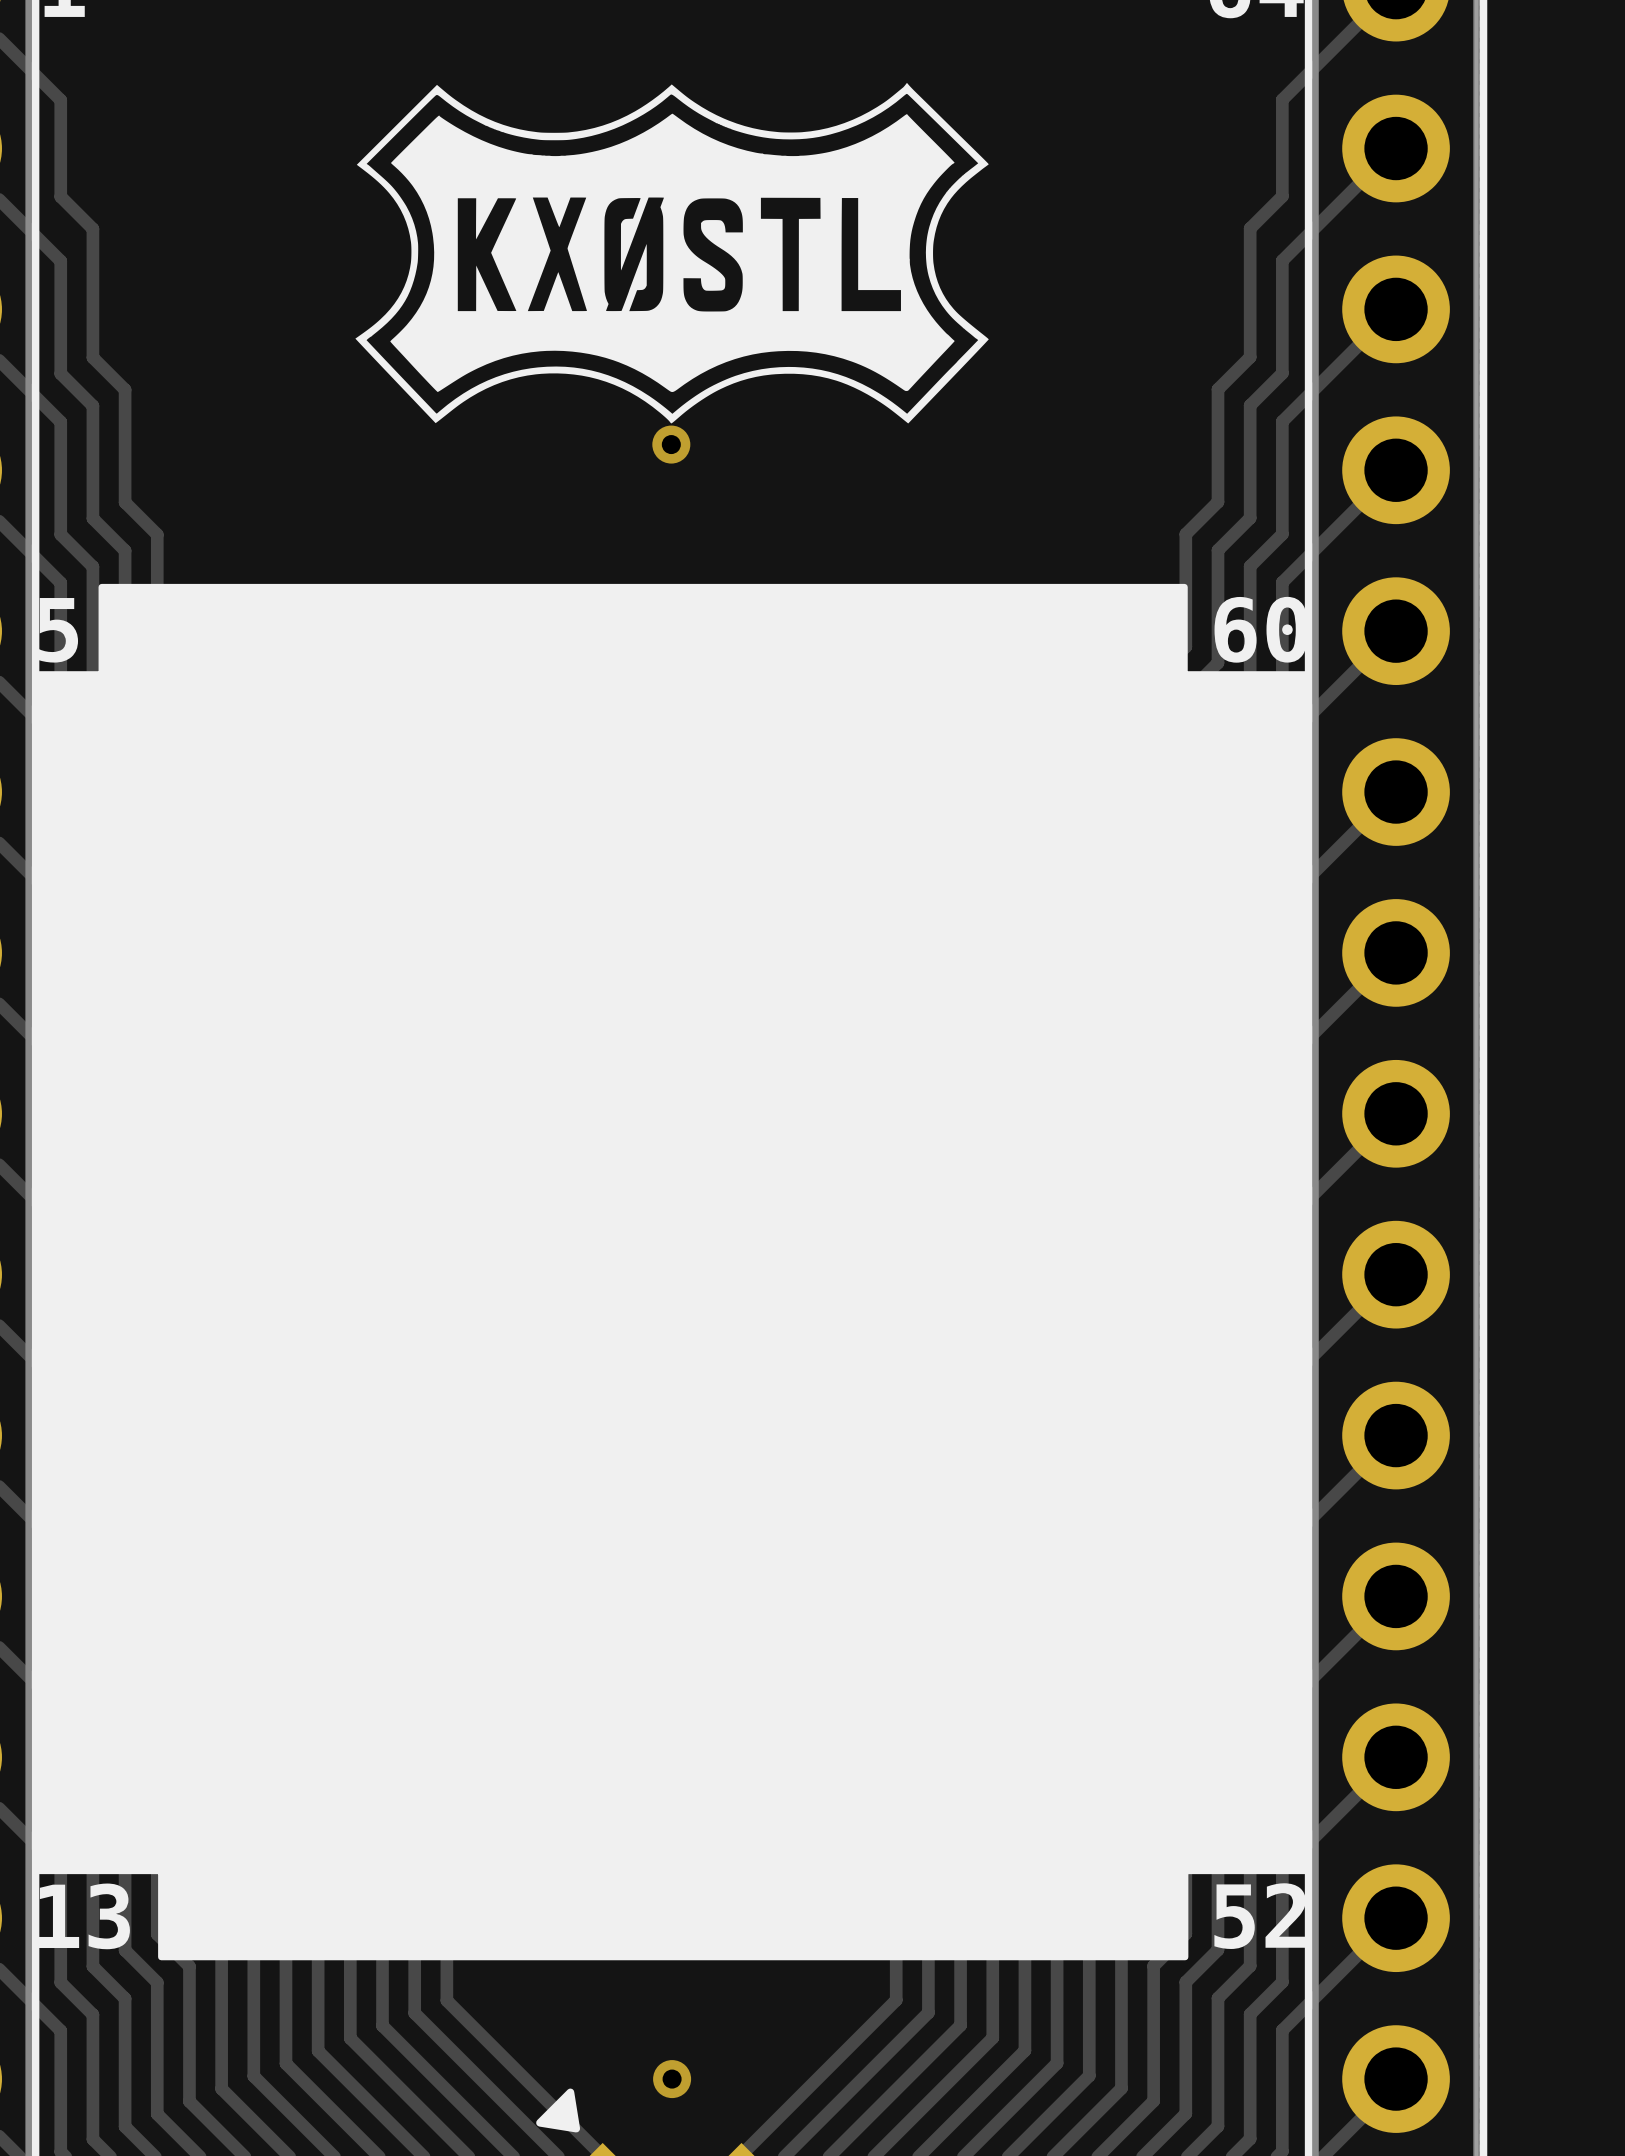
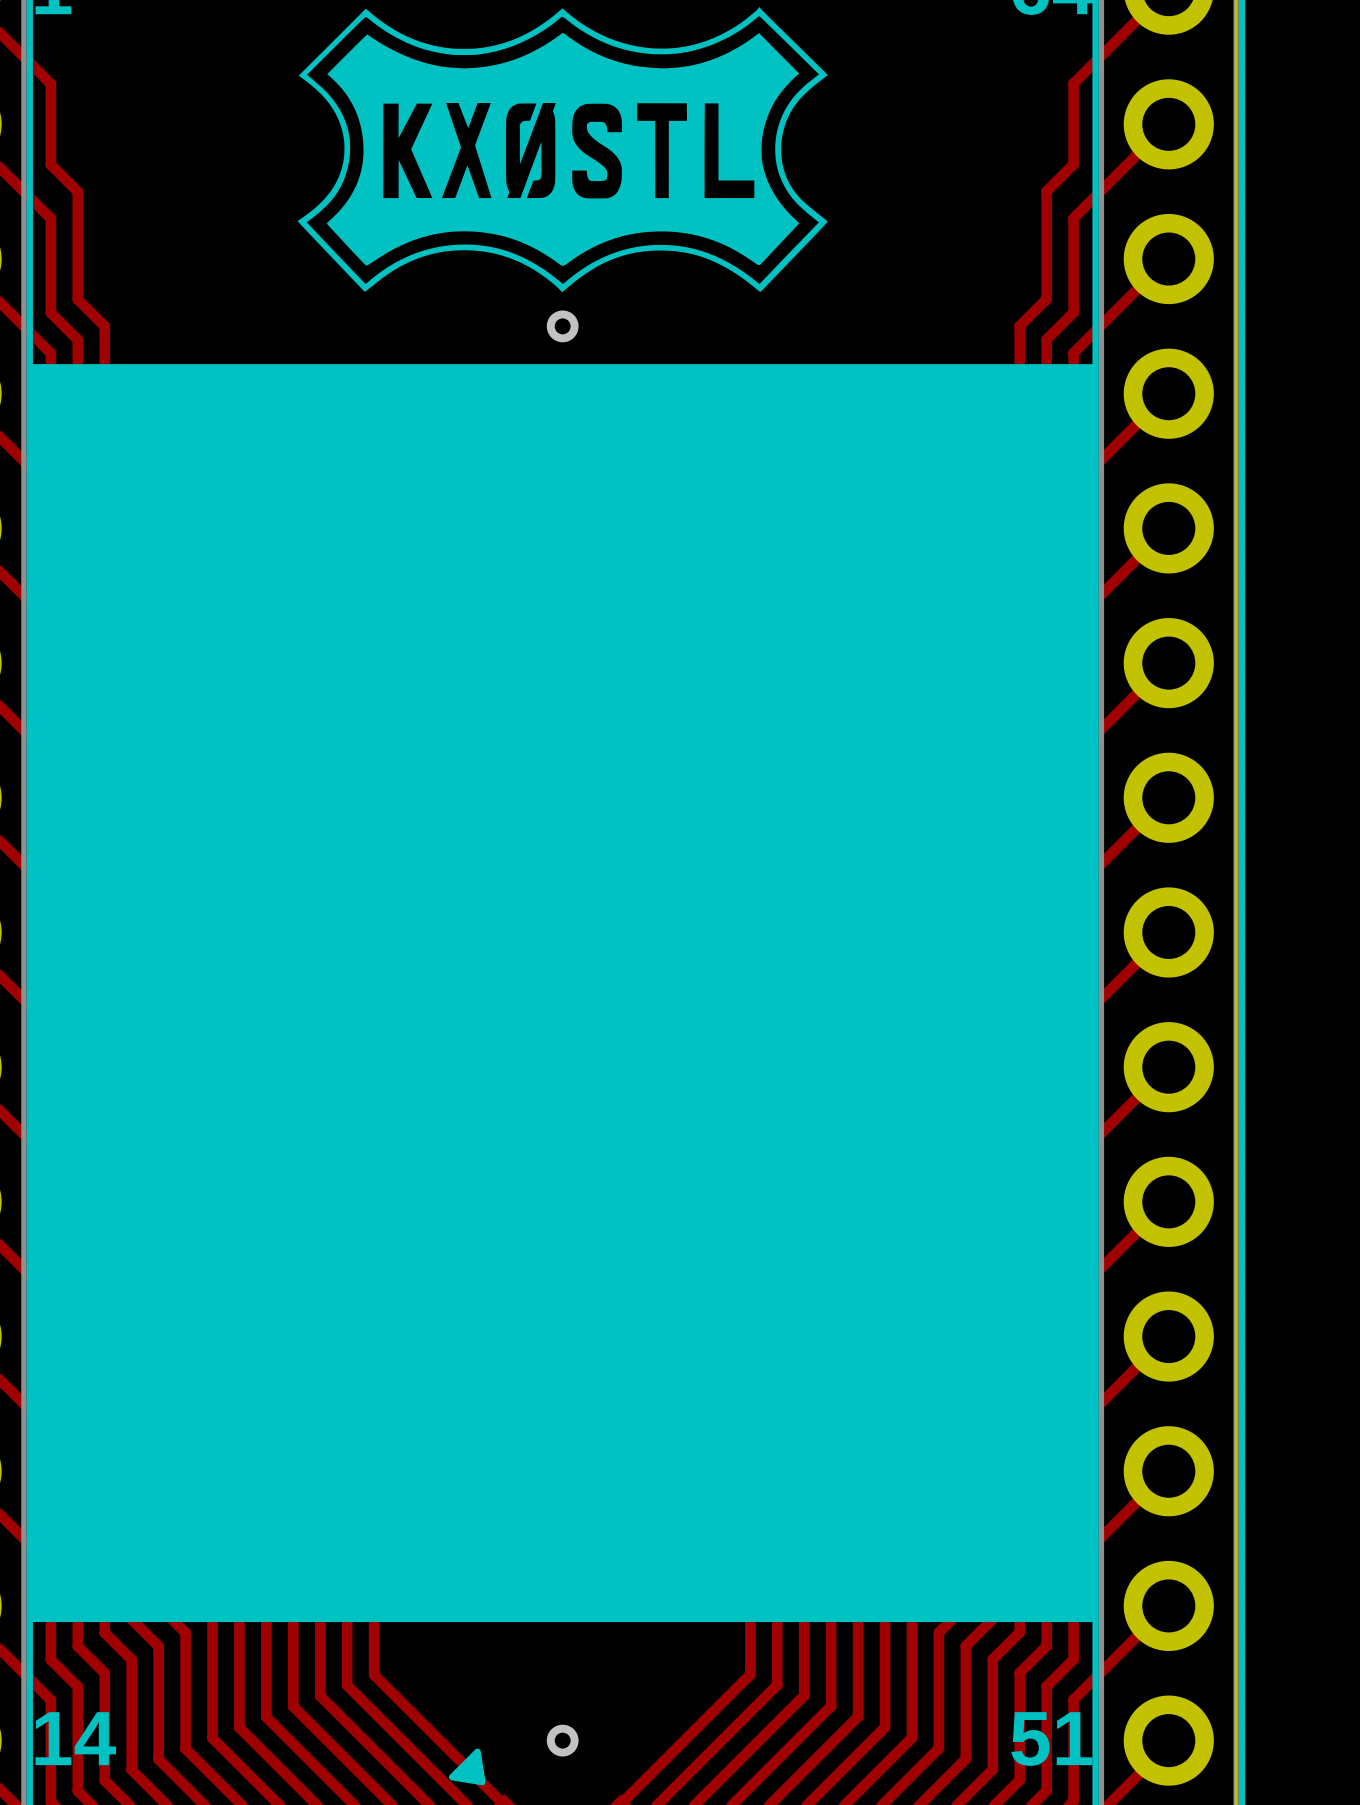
drawing position: (672, 253) -> (562, 149)
drawing: none -> [28, 364, 1098, 1623]
via position: (671, 444) -> (562, 326)
drawing: [33, 583, 1311, 1961] -> none
text: 60 (1261, 629) -> none
text: 5 (57, 630) -> none
text: 13 (84, 1916) -> none
text: 52 (1260, 1916) -> none
text: none -> 14 (75, 1738)
text: none -> 51 (1051, 1739)

